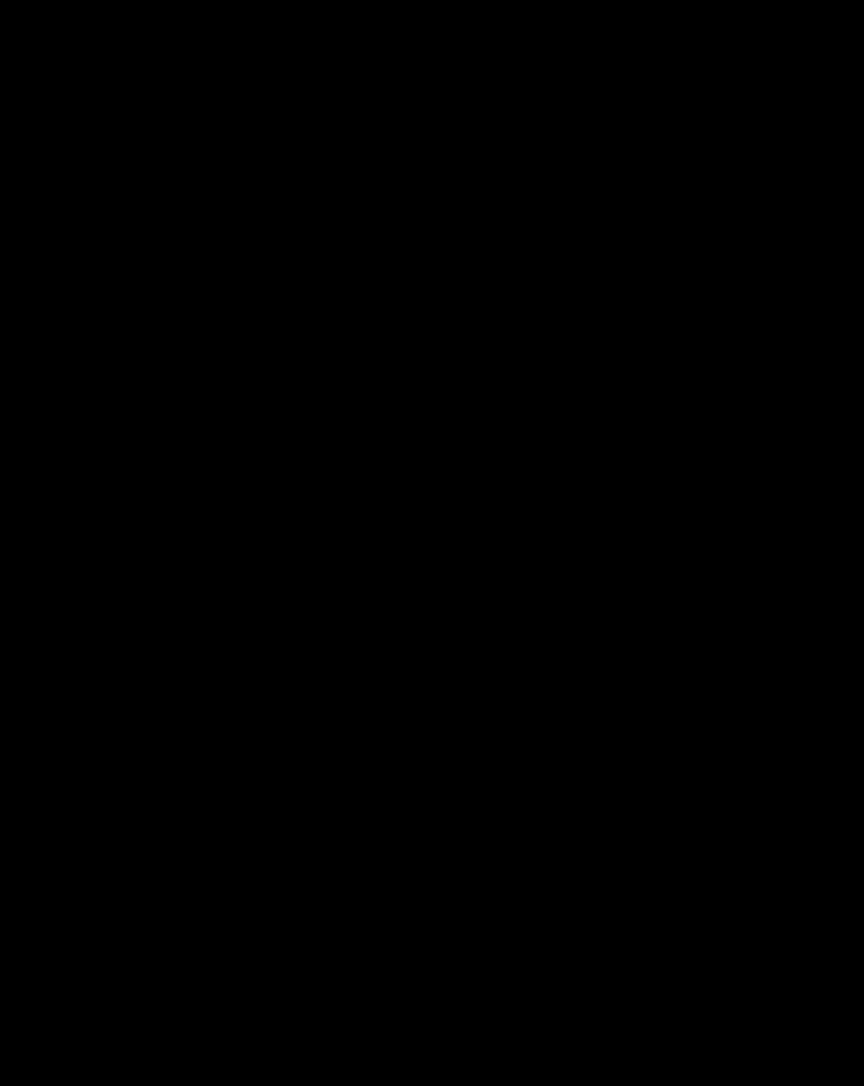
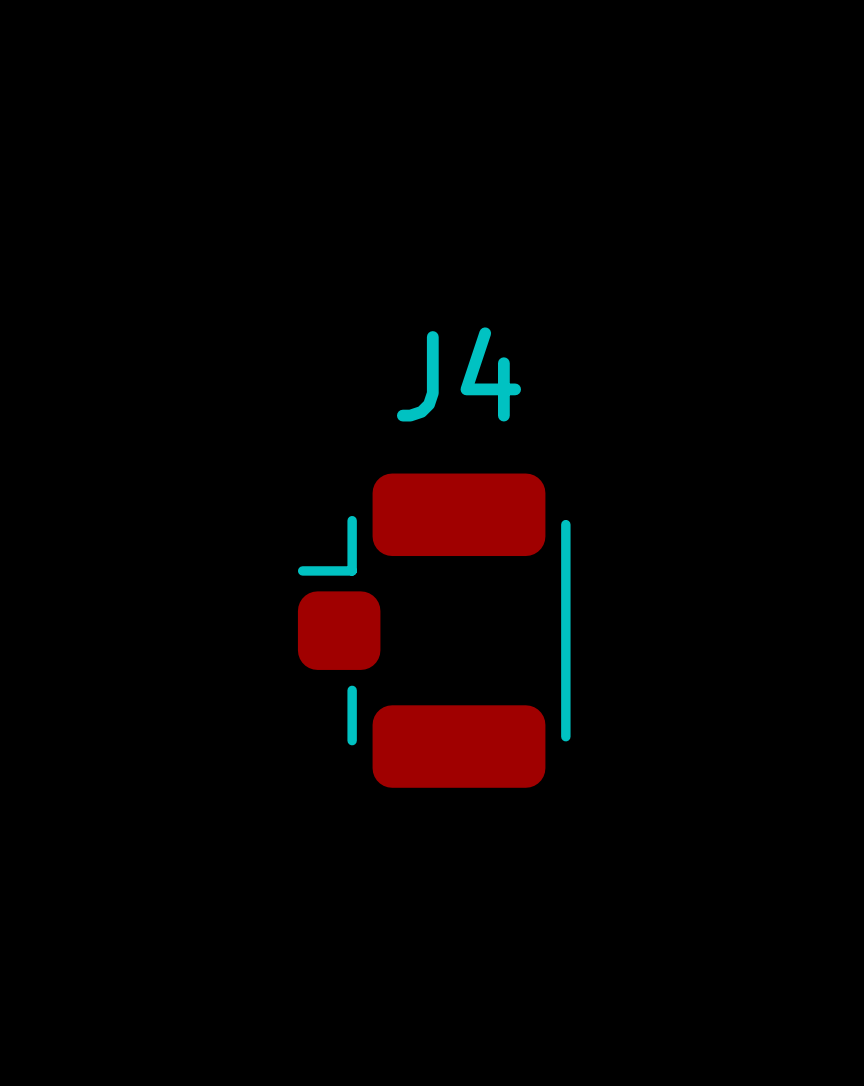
J4: none -> (434, 630)

